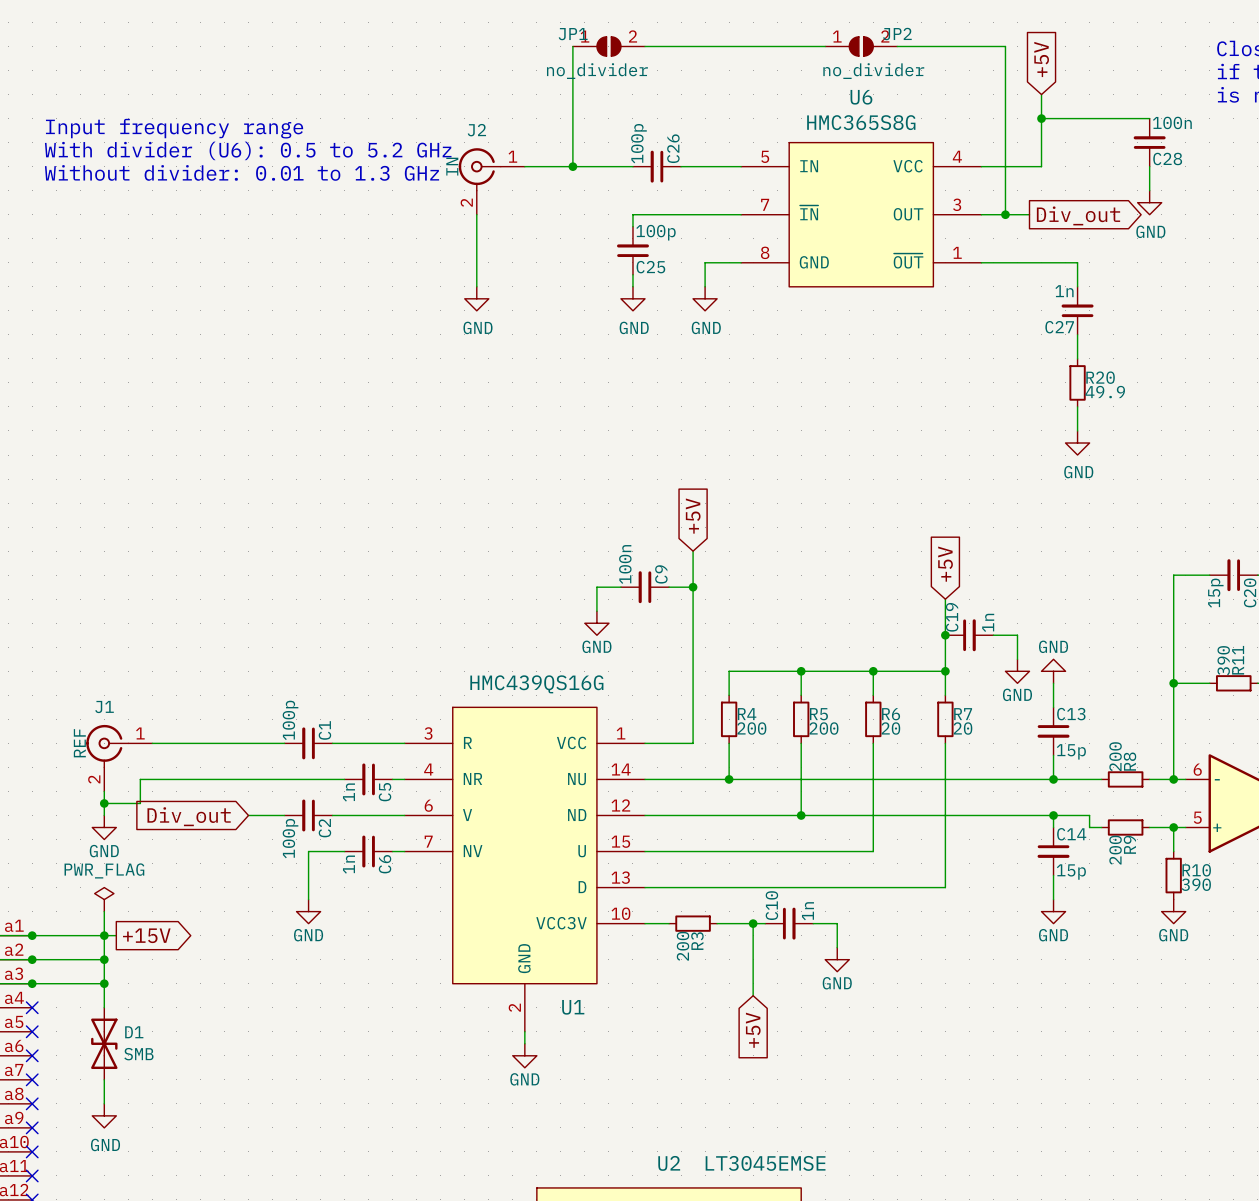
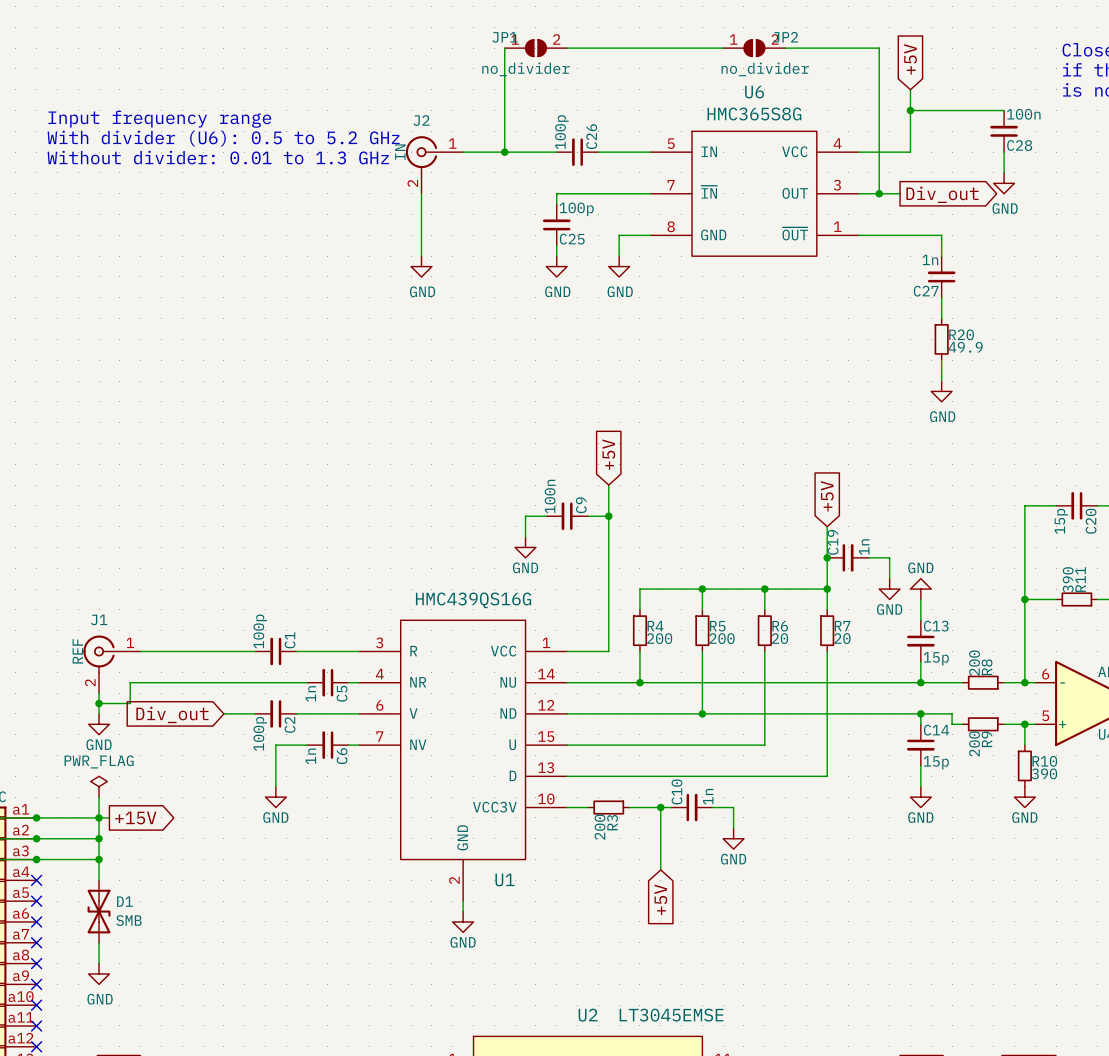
U6 symbol: [741, 142, 982, 287] -> [650, 131, 859, 257]
U1 symbol: [404, 707, 646, 1032] -> [359, 620, 568, 902]

